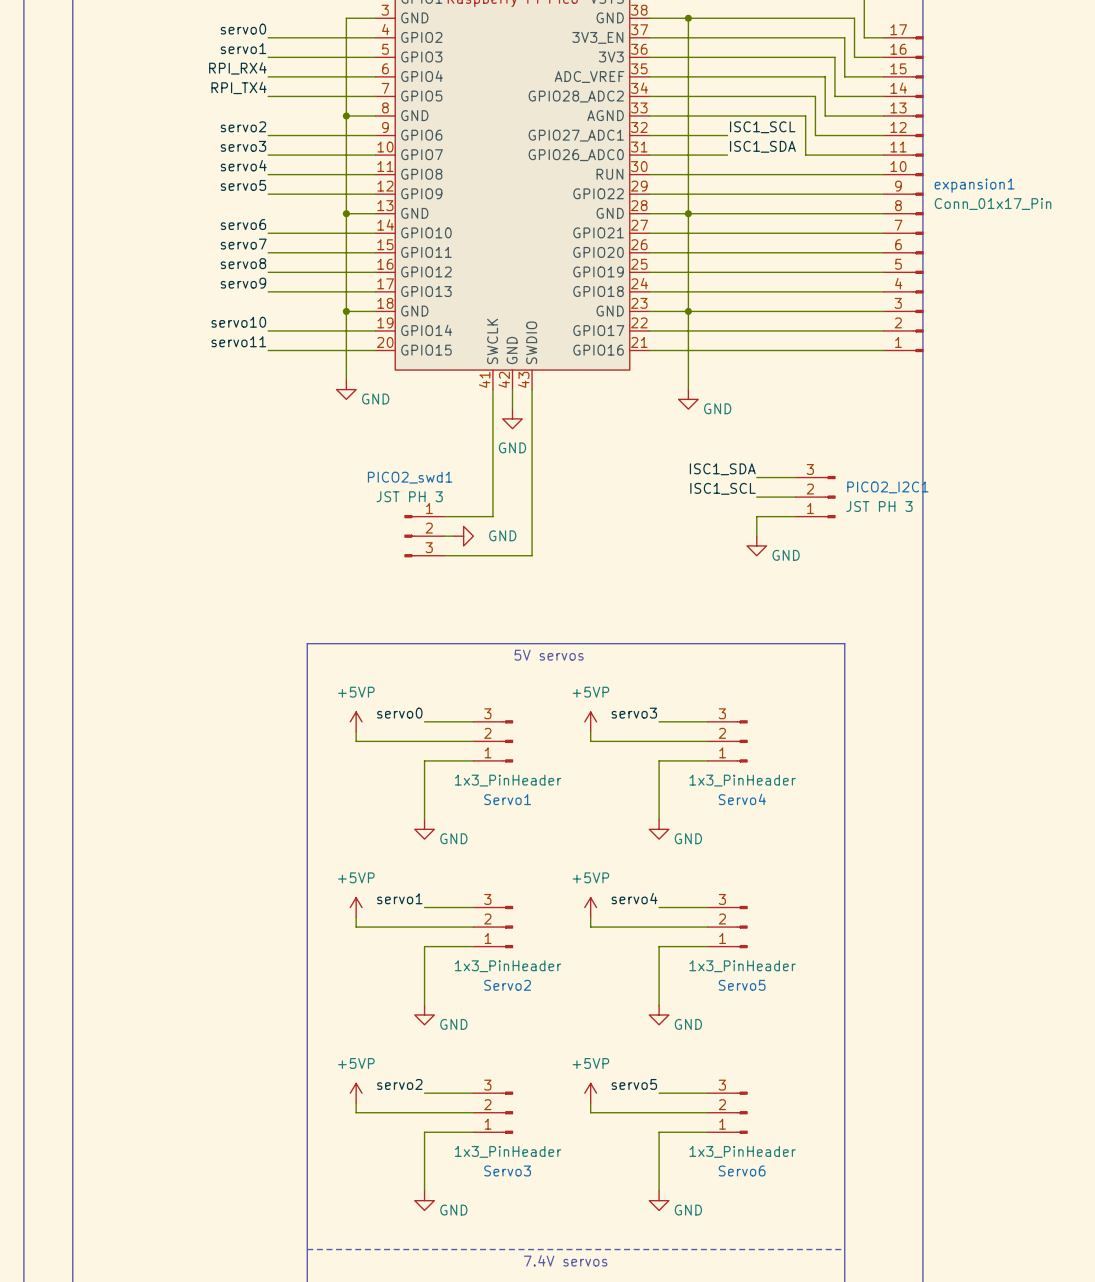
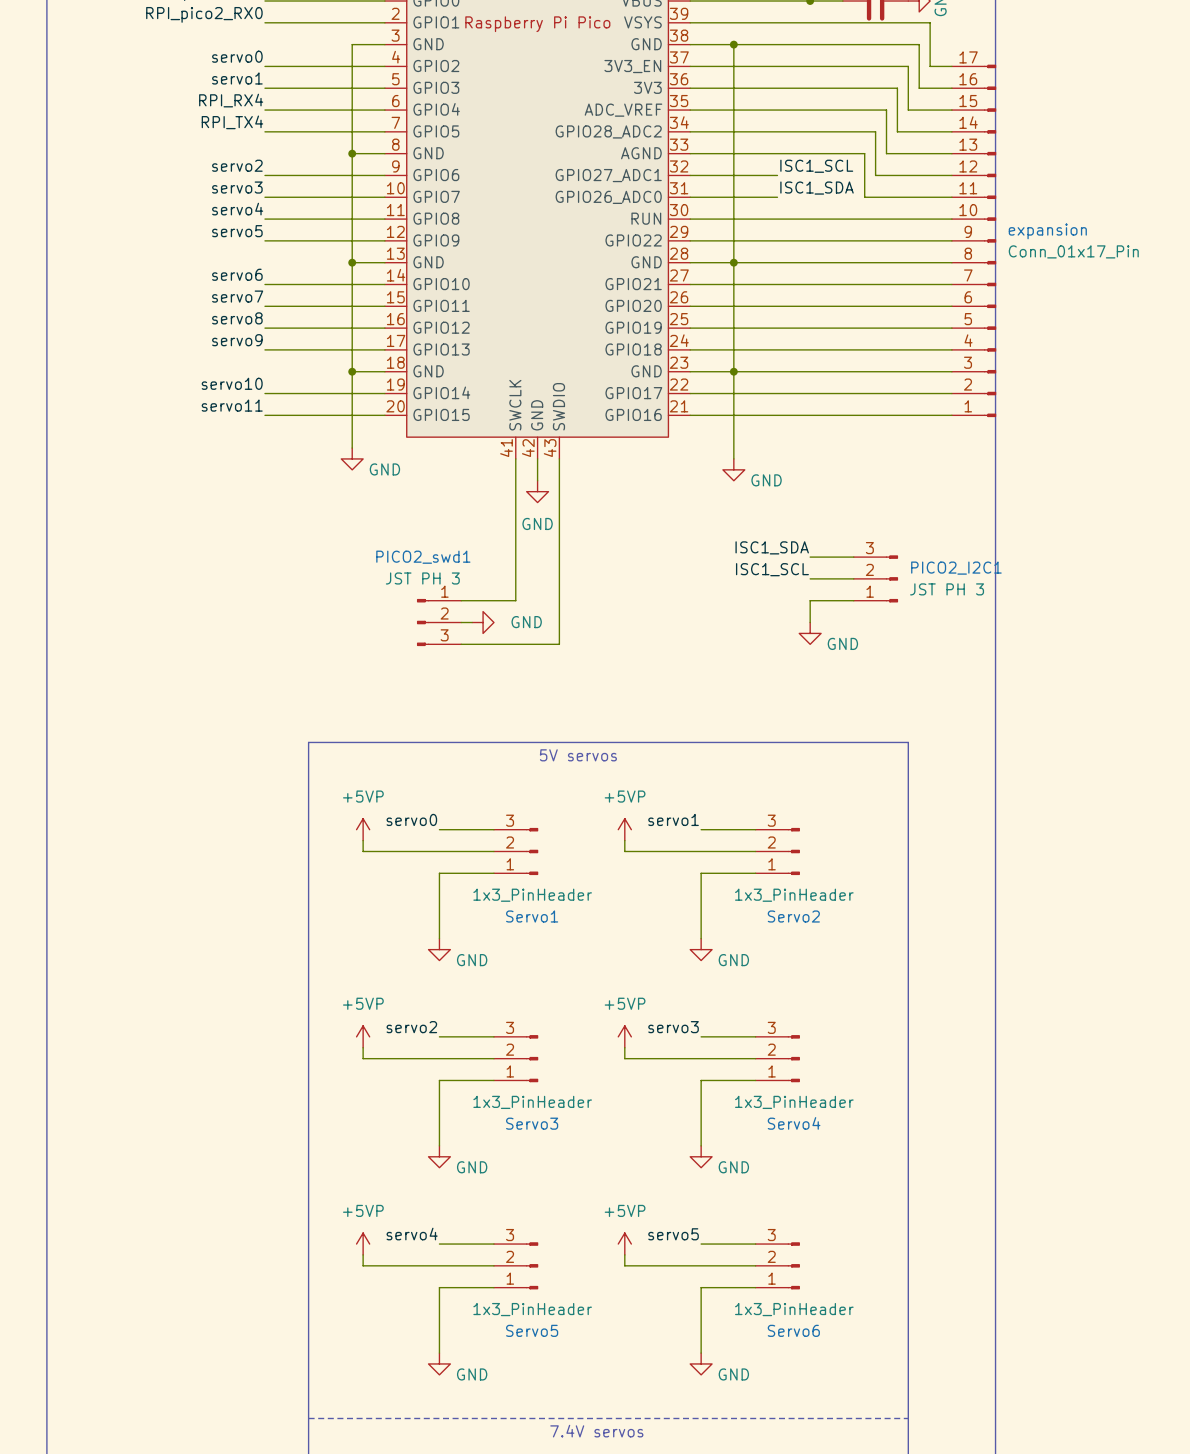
expansion1 name: expansion1 (974, 185) -> expansion (1047, 231)
label: servo3 (634, 713) -> servo1 (673, 819)
Servo4 name: Servo4 (742, 799) -> Servo2 (793, 916)
label: servo1 (399, 898) -> servo2 (411, 1027)
label: servo4 (634, 898) -> servo3 (673, 1027)
Servo2 name: Servo2 (507, 985) -> Servo3 (532, 1123)
Servo5 name: Servo5 (742, 985) -> Servo4 (794, 1123)
label: servo2 (399, 1084) -> servo4 (412, 1234)
Servo3 name: Servo3 (507, 1170) -> Servo5 (532, 1330)

